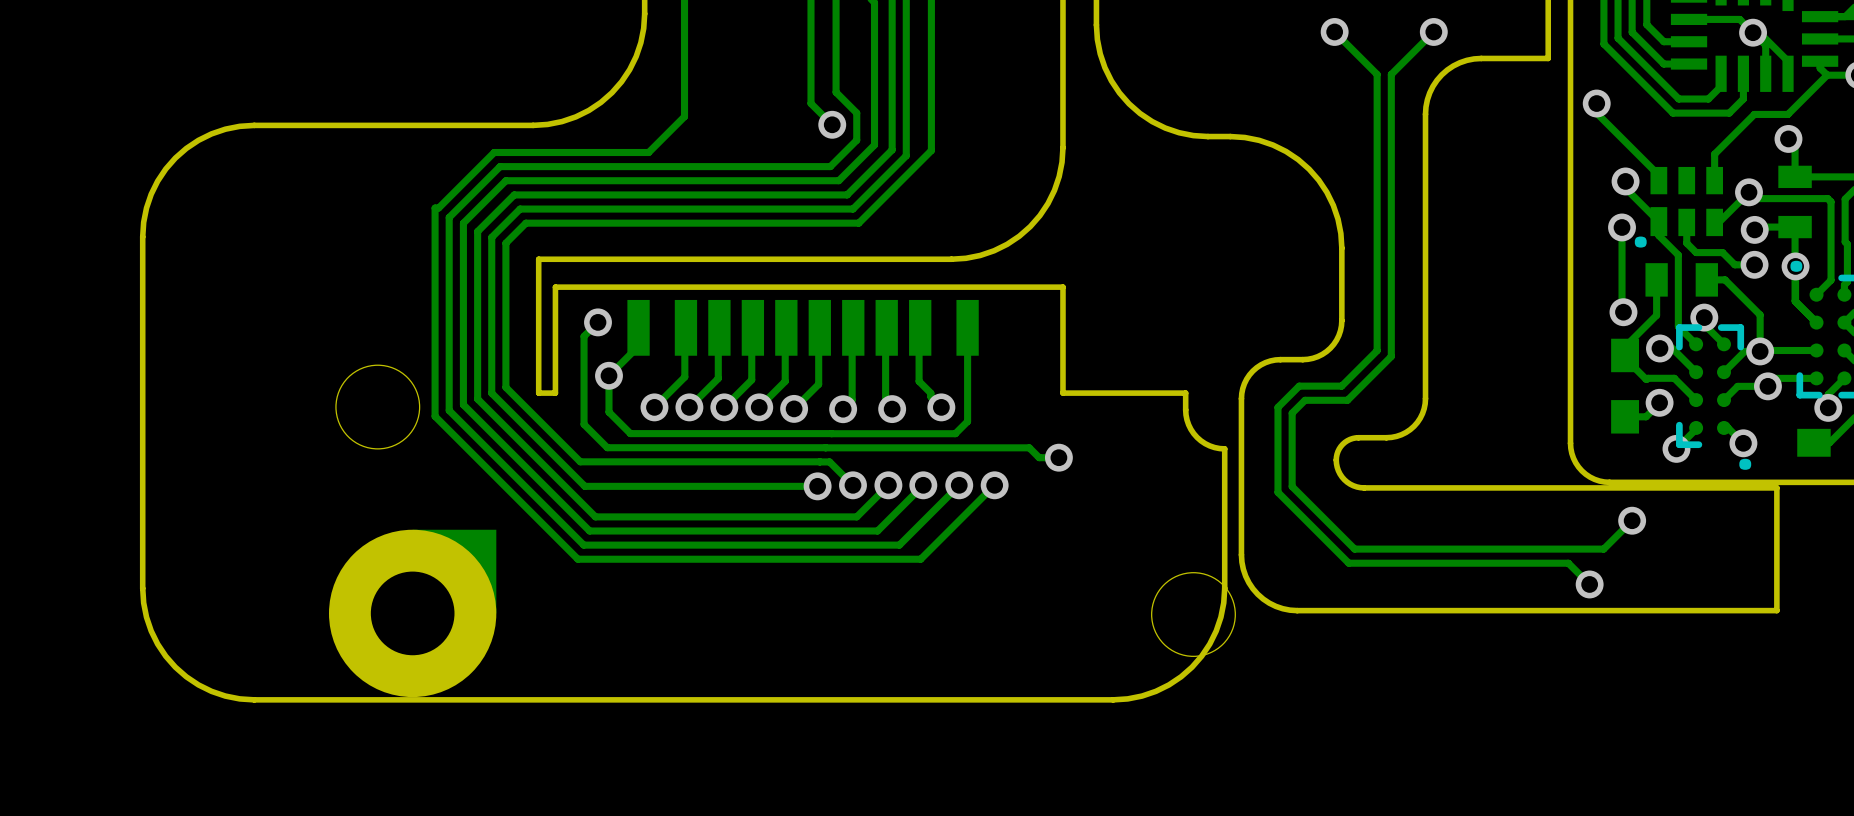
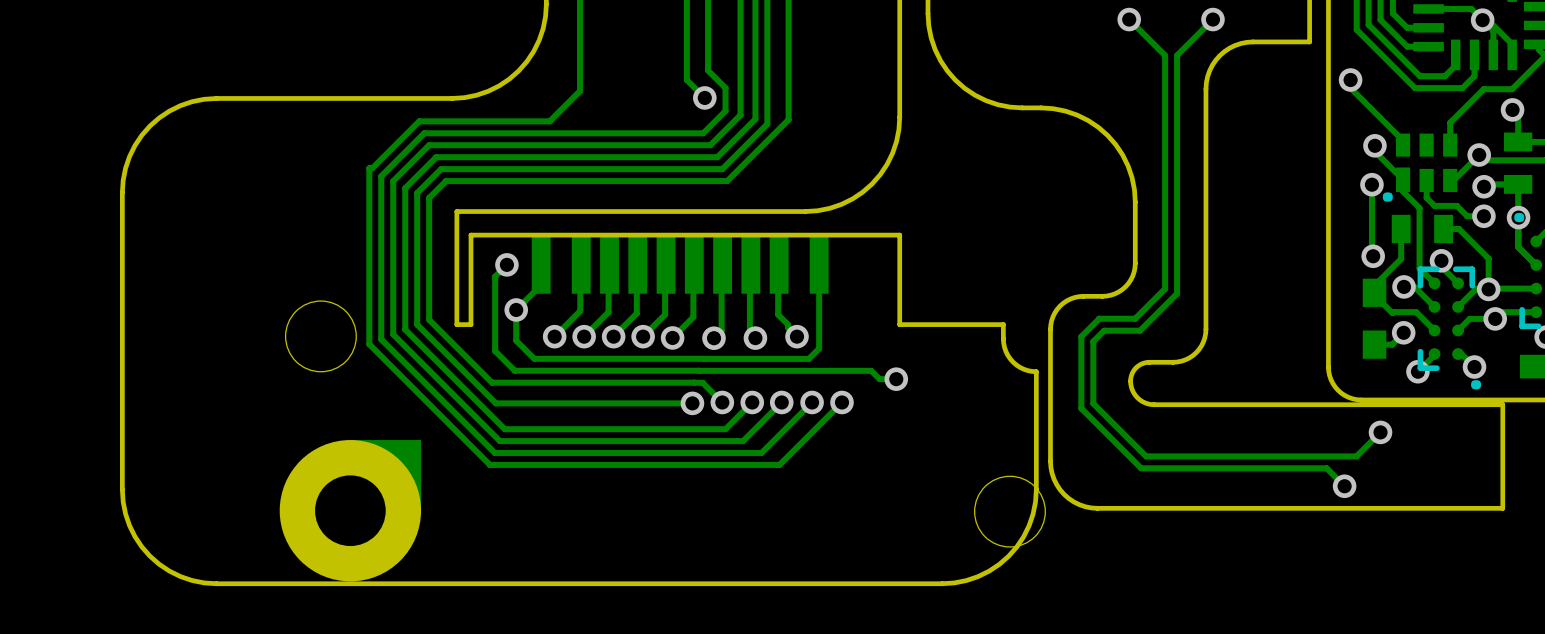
part footprint: [627, 299, 979, 356] -> [531, 234, 829, 294]

